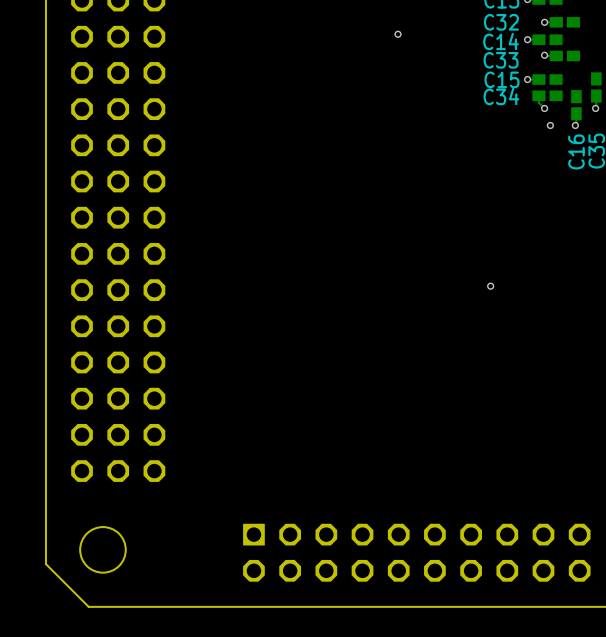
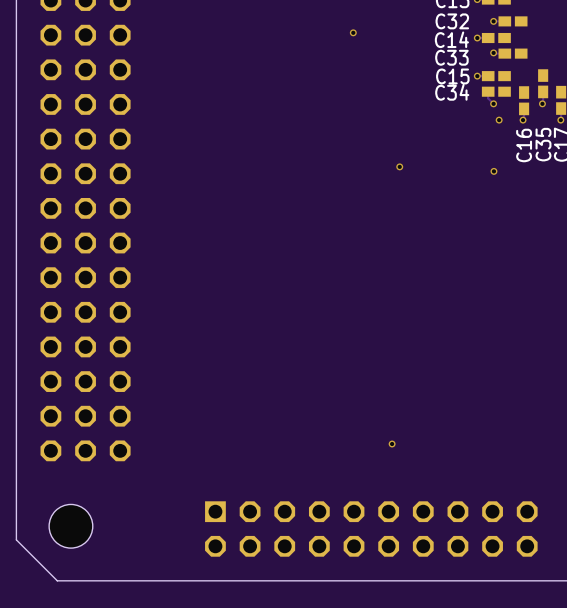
via: none -> (399, 166)
via: none -> (493, 171)
via: (490, 286) -> none
via: none -> (392, 444)

